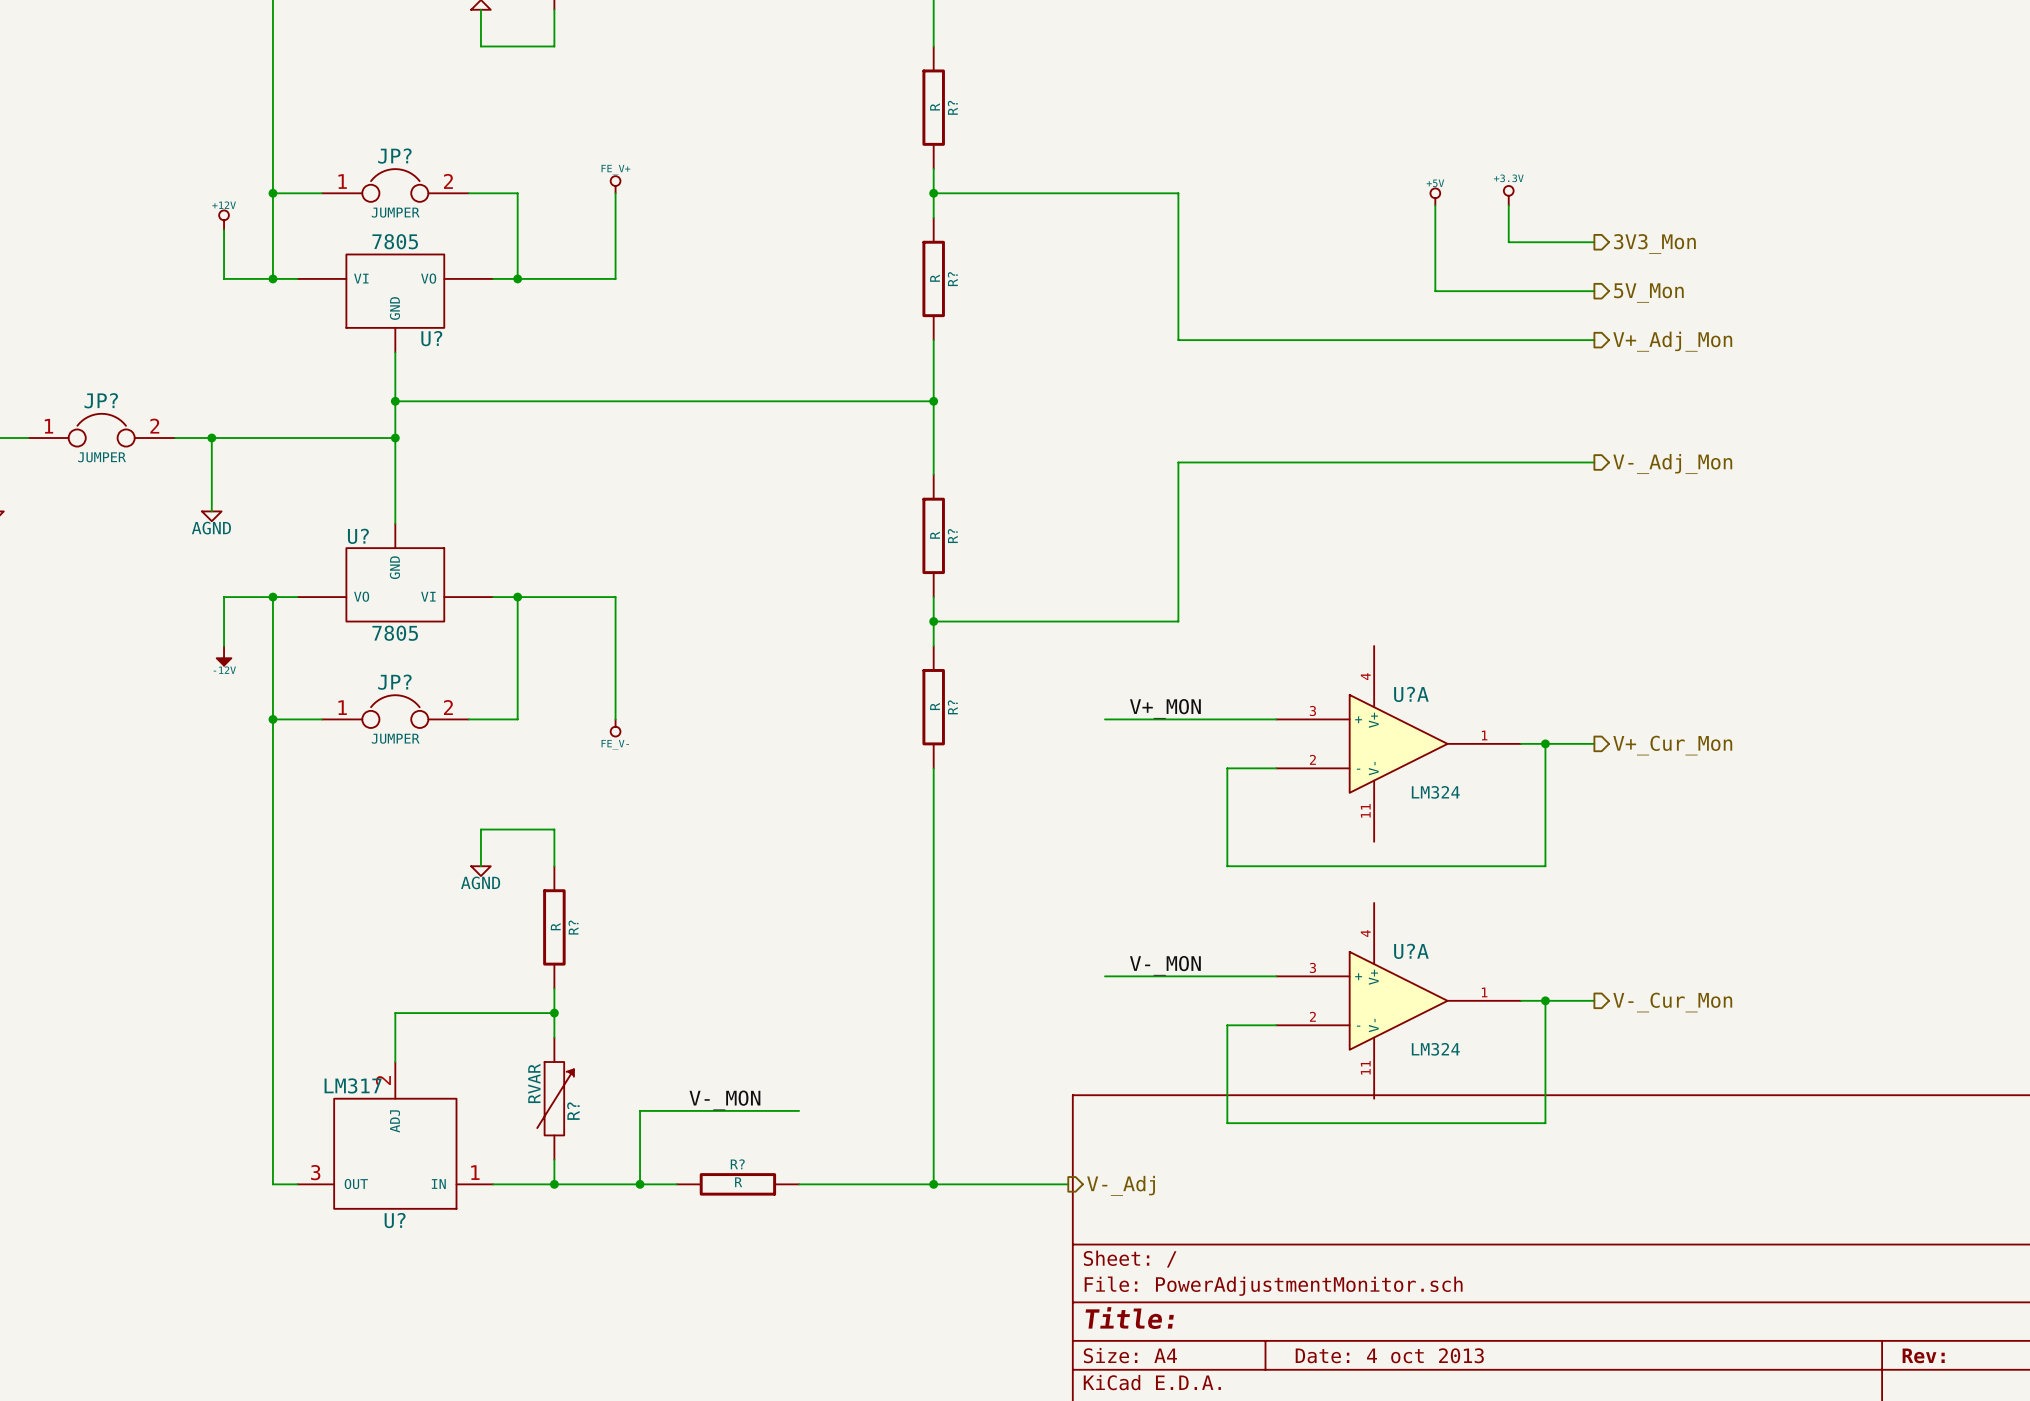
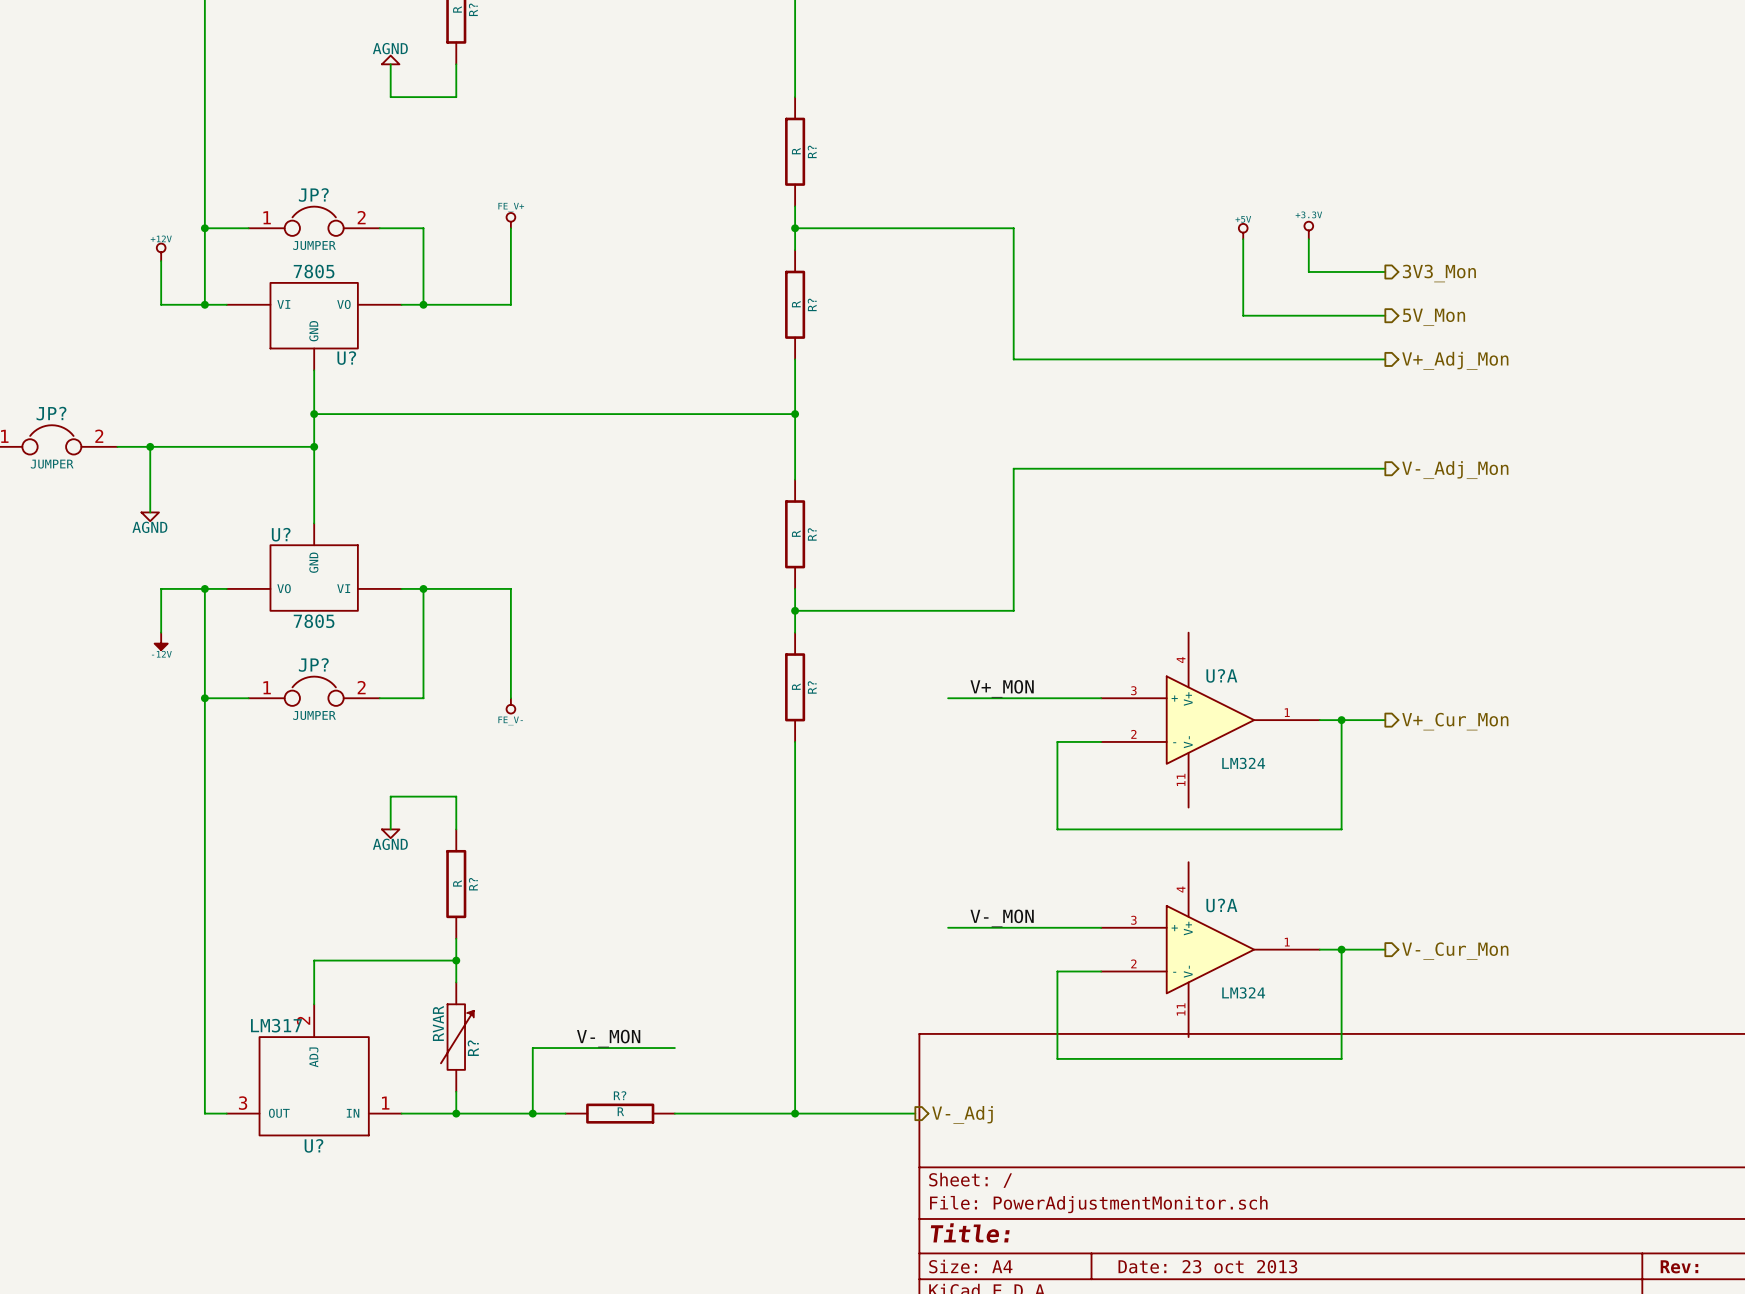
title block: Date: 4 oct 2013 (1389, 1355) -> Date: 23 oct 2013 (1207, 1266)

